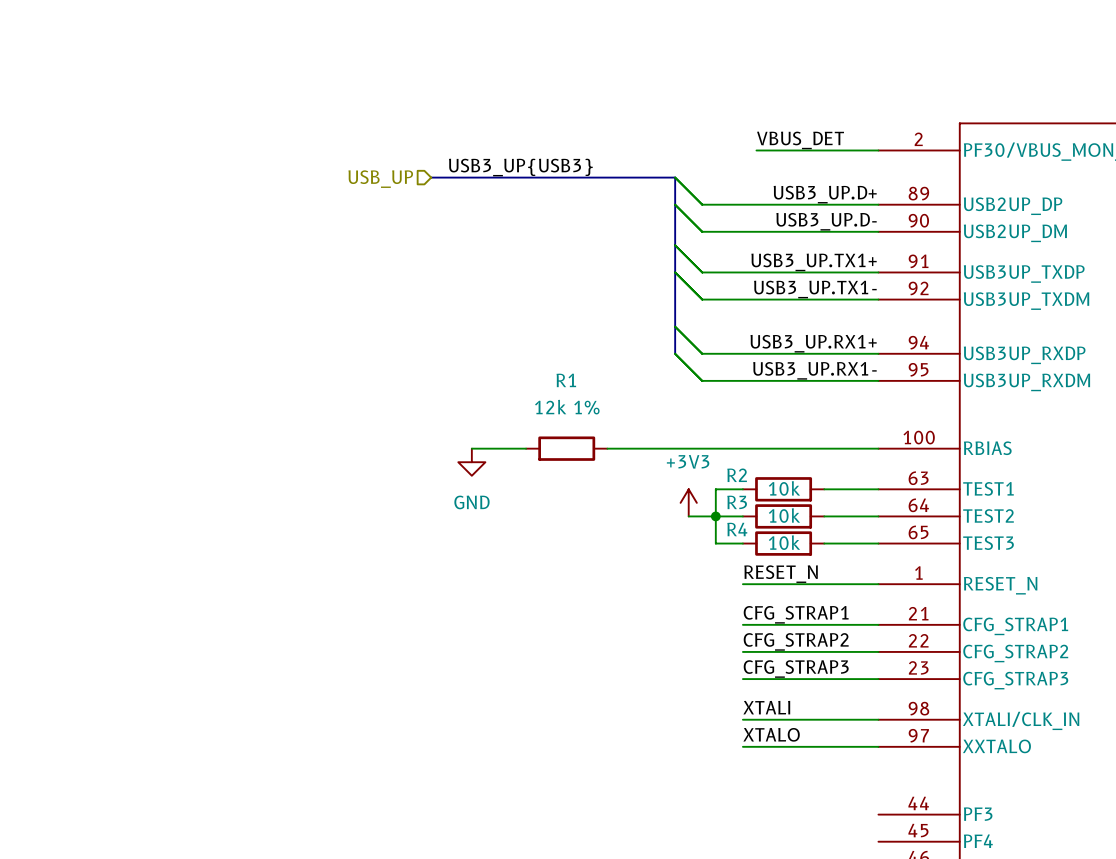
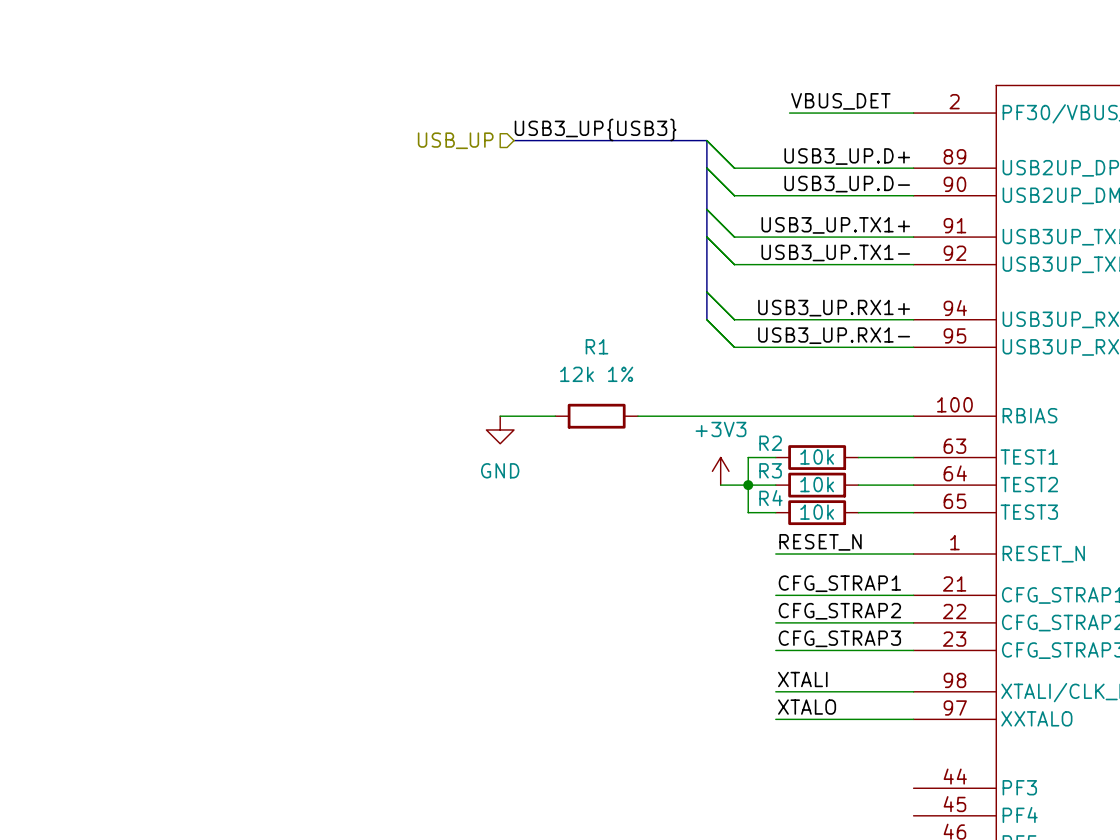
label position: USB3_UP{USB3} (520, 167) -> USB3_UP{USB3} (595, 129)
bus: (431, 177) (485, 177) -> none
hierarchical label position: USB_UP (380, 179) -> USB_UP (455, 140)

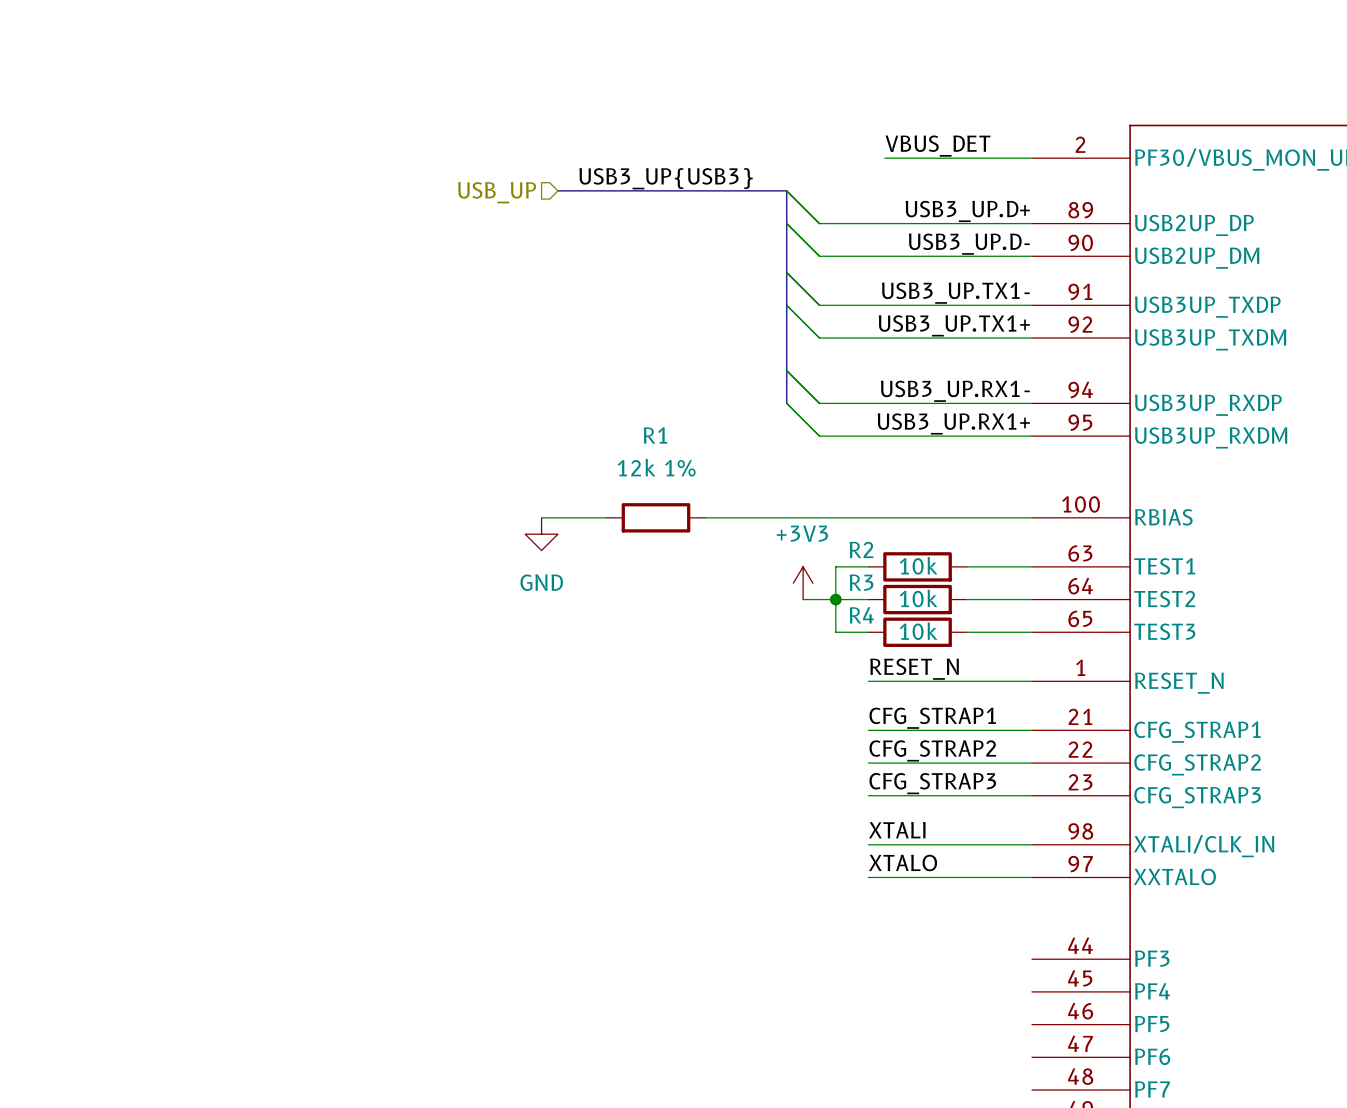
label: USB3_UP.TX1+ (835, 225) -> USB3_UP.TX1- (955, 293)
label: USB3_UP.TX1- (835, 252) -> USB3_UP.TX1+ (954, 325)
label: USB3_UP.RX1+ (834, 308) -> USB3_UP.RX1- (955, 391)
label: USB3_UP.RX1- (834, 335) -> USB3_UP.RX1+ (953, 423)

